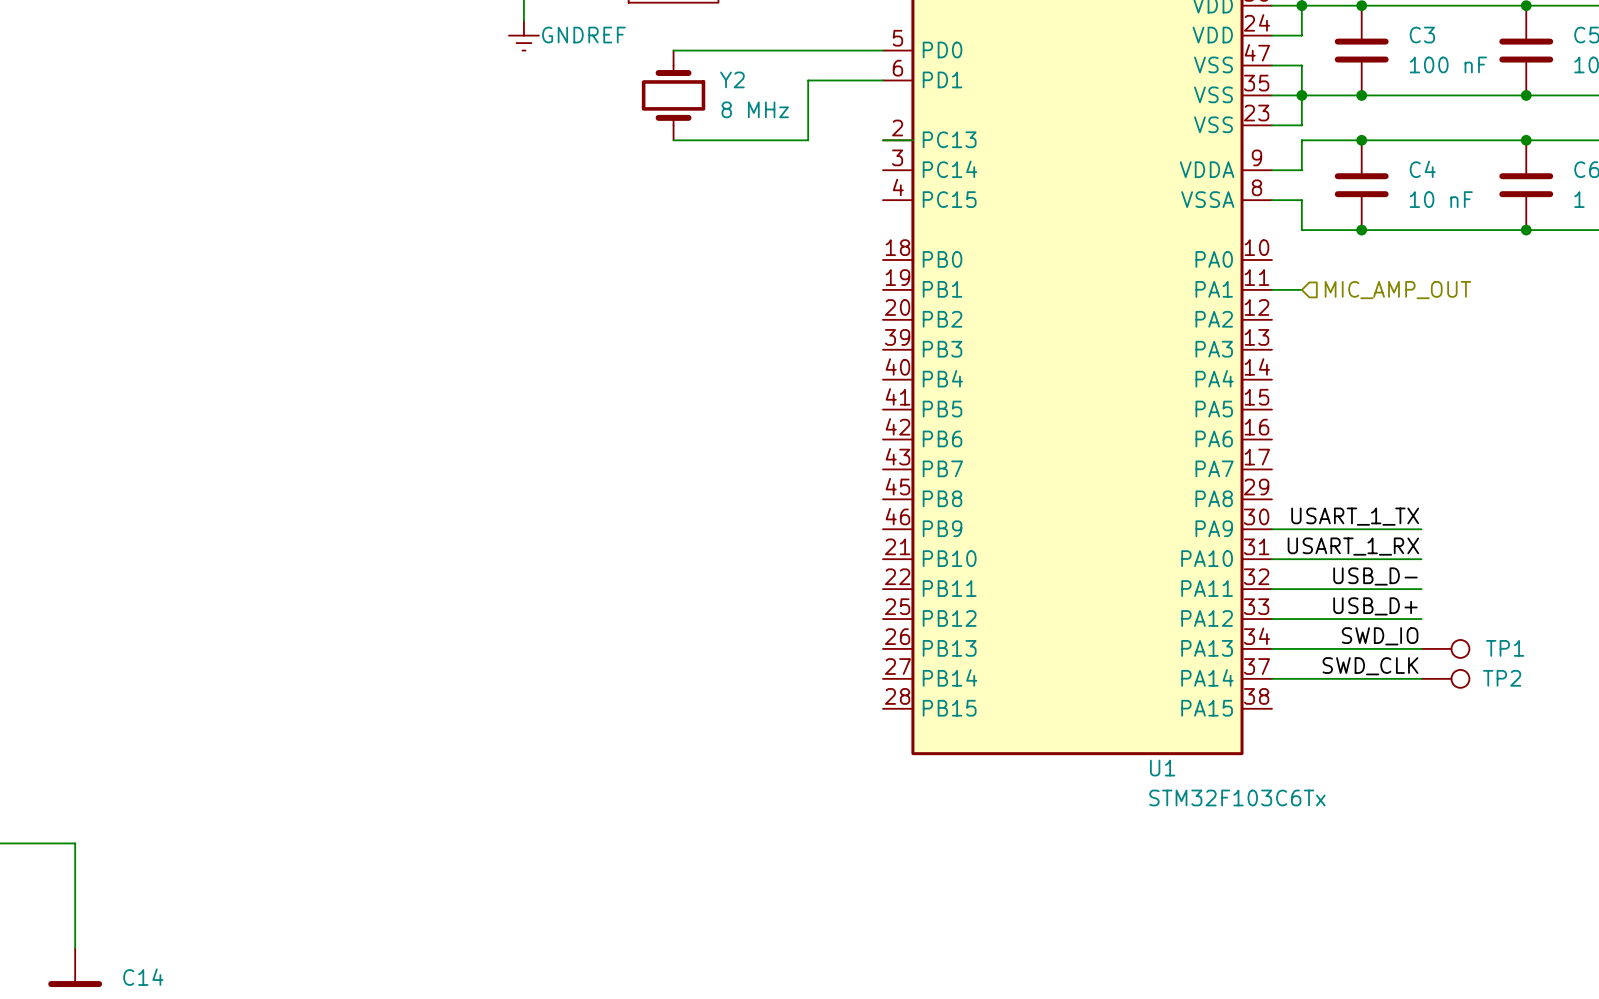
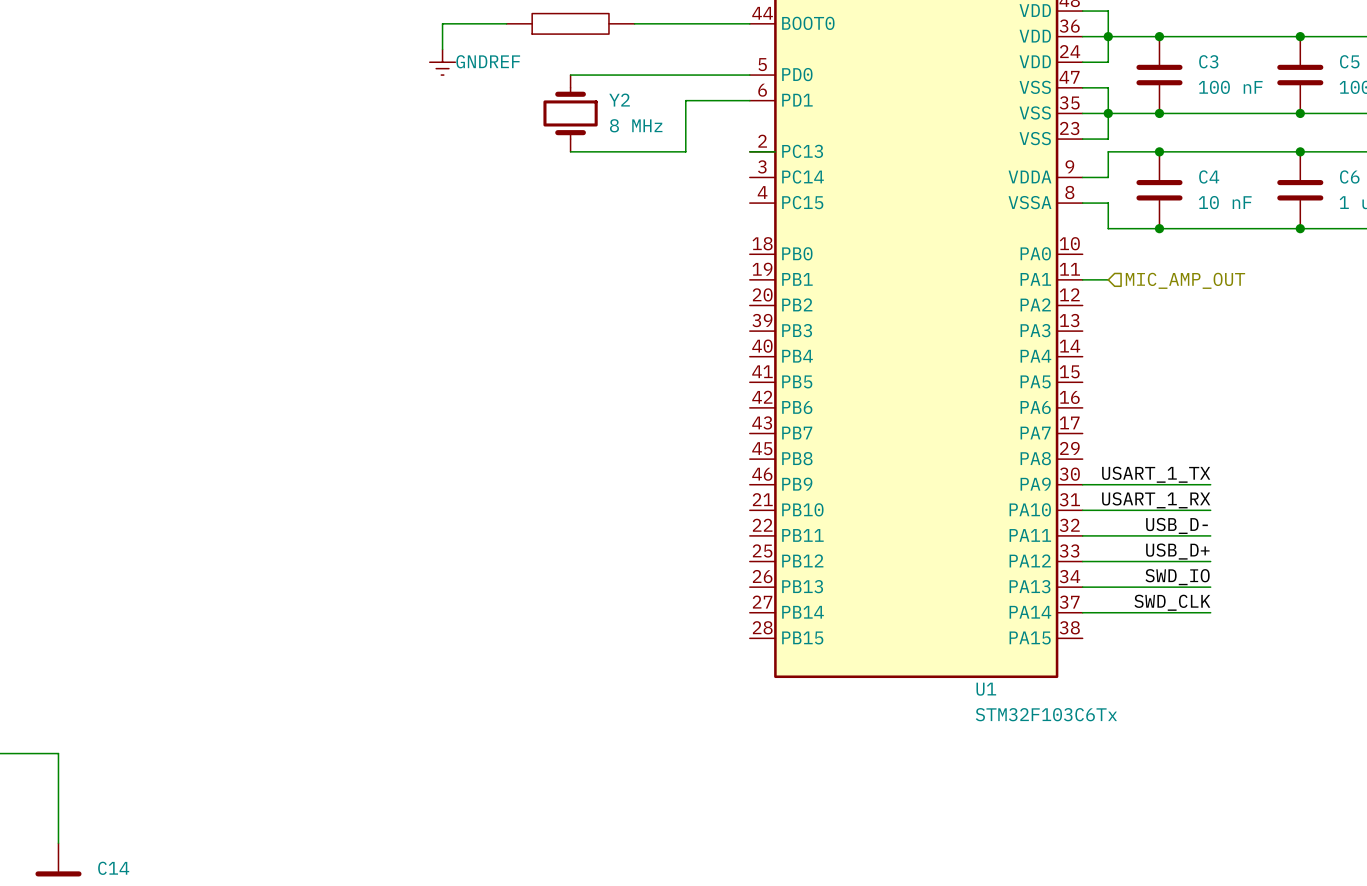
TP1: (1445, 648) -> none
TP2: (1445, 678) -> none

